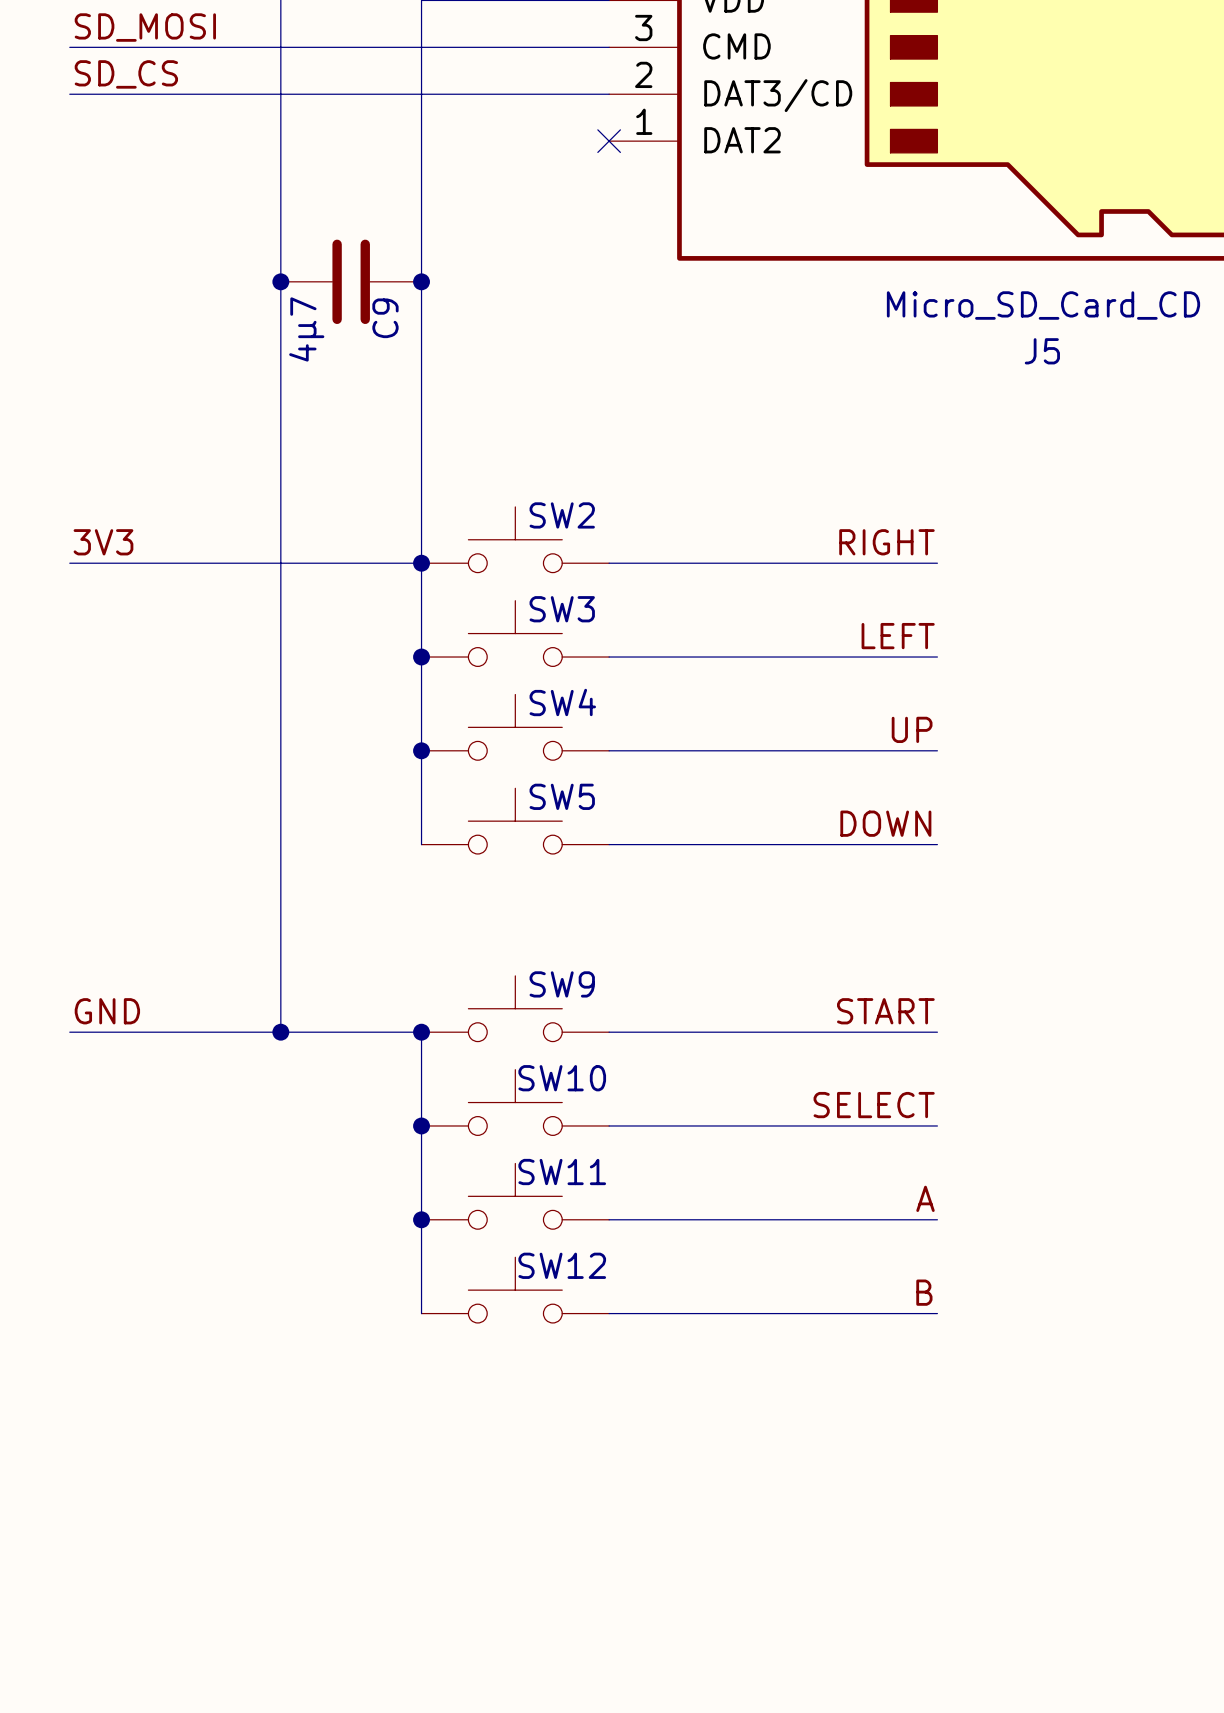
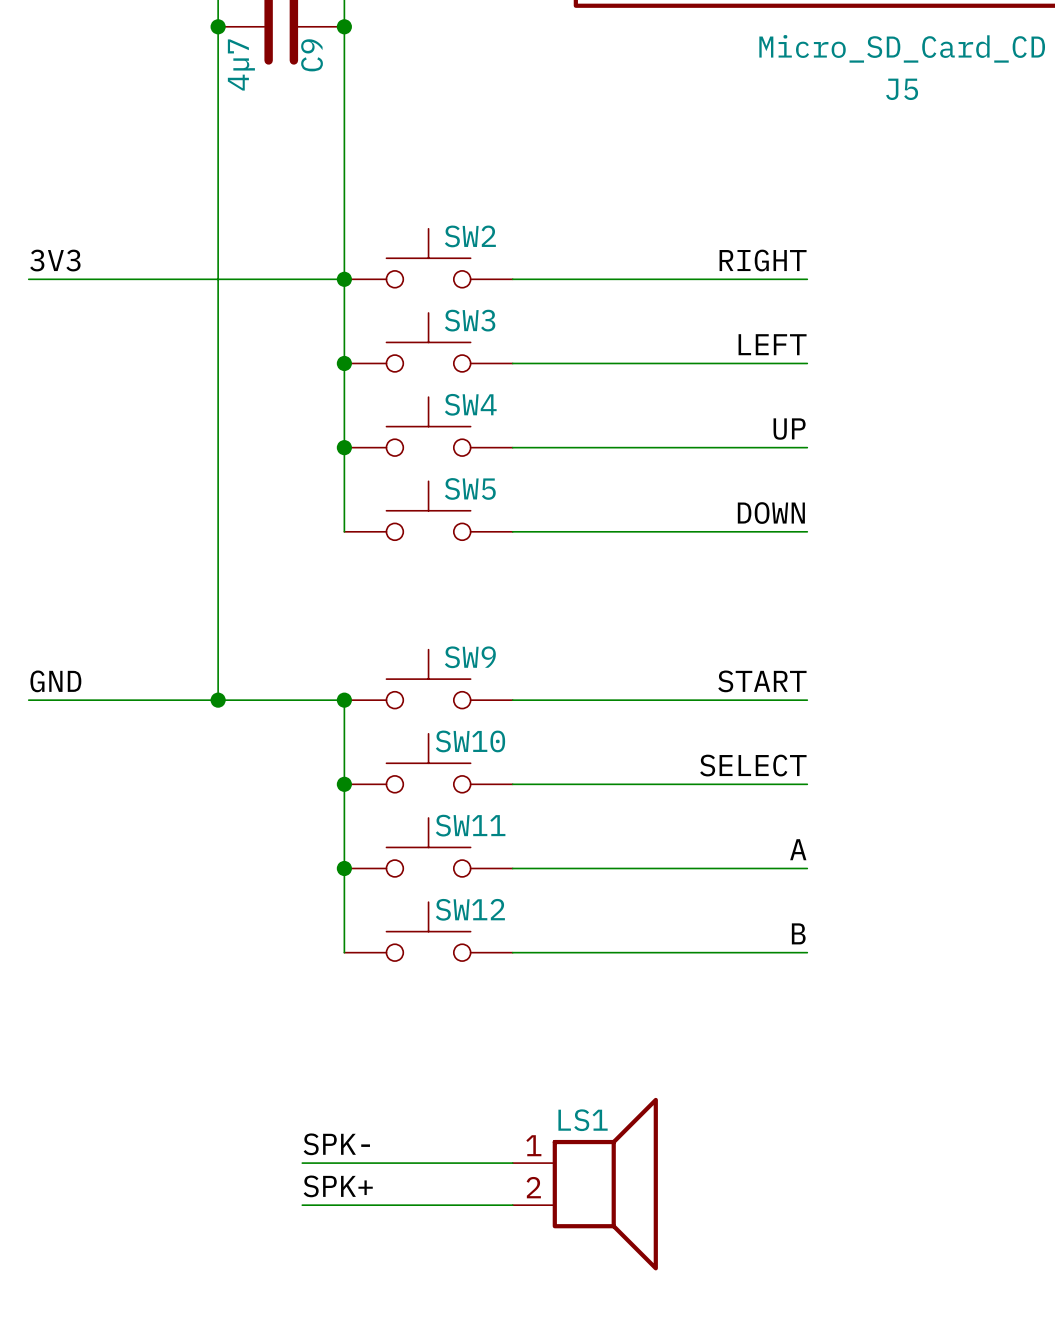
label: none -> SPK- (336, 1144)
wire: none -> (302, 1163) (512, 1163)
LS1: none -> (585, 1184)
label: none -> SPK+ (338, 1186)
wire: none -> (302, 1205) (512, 1205)

